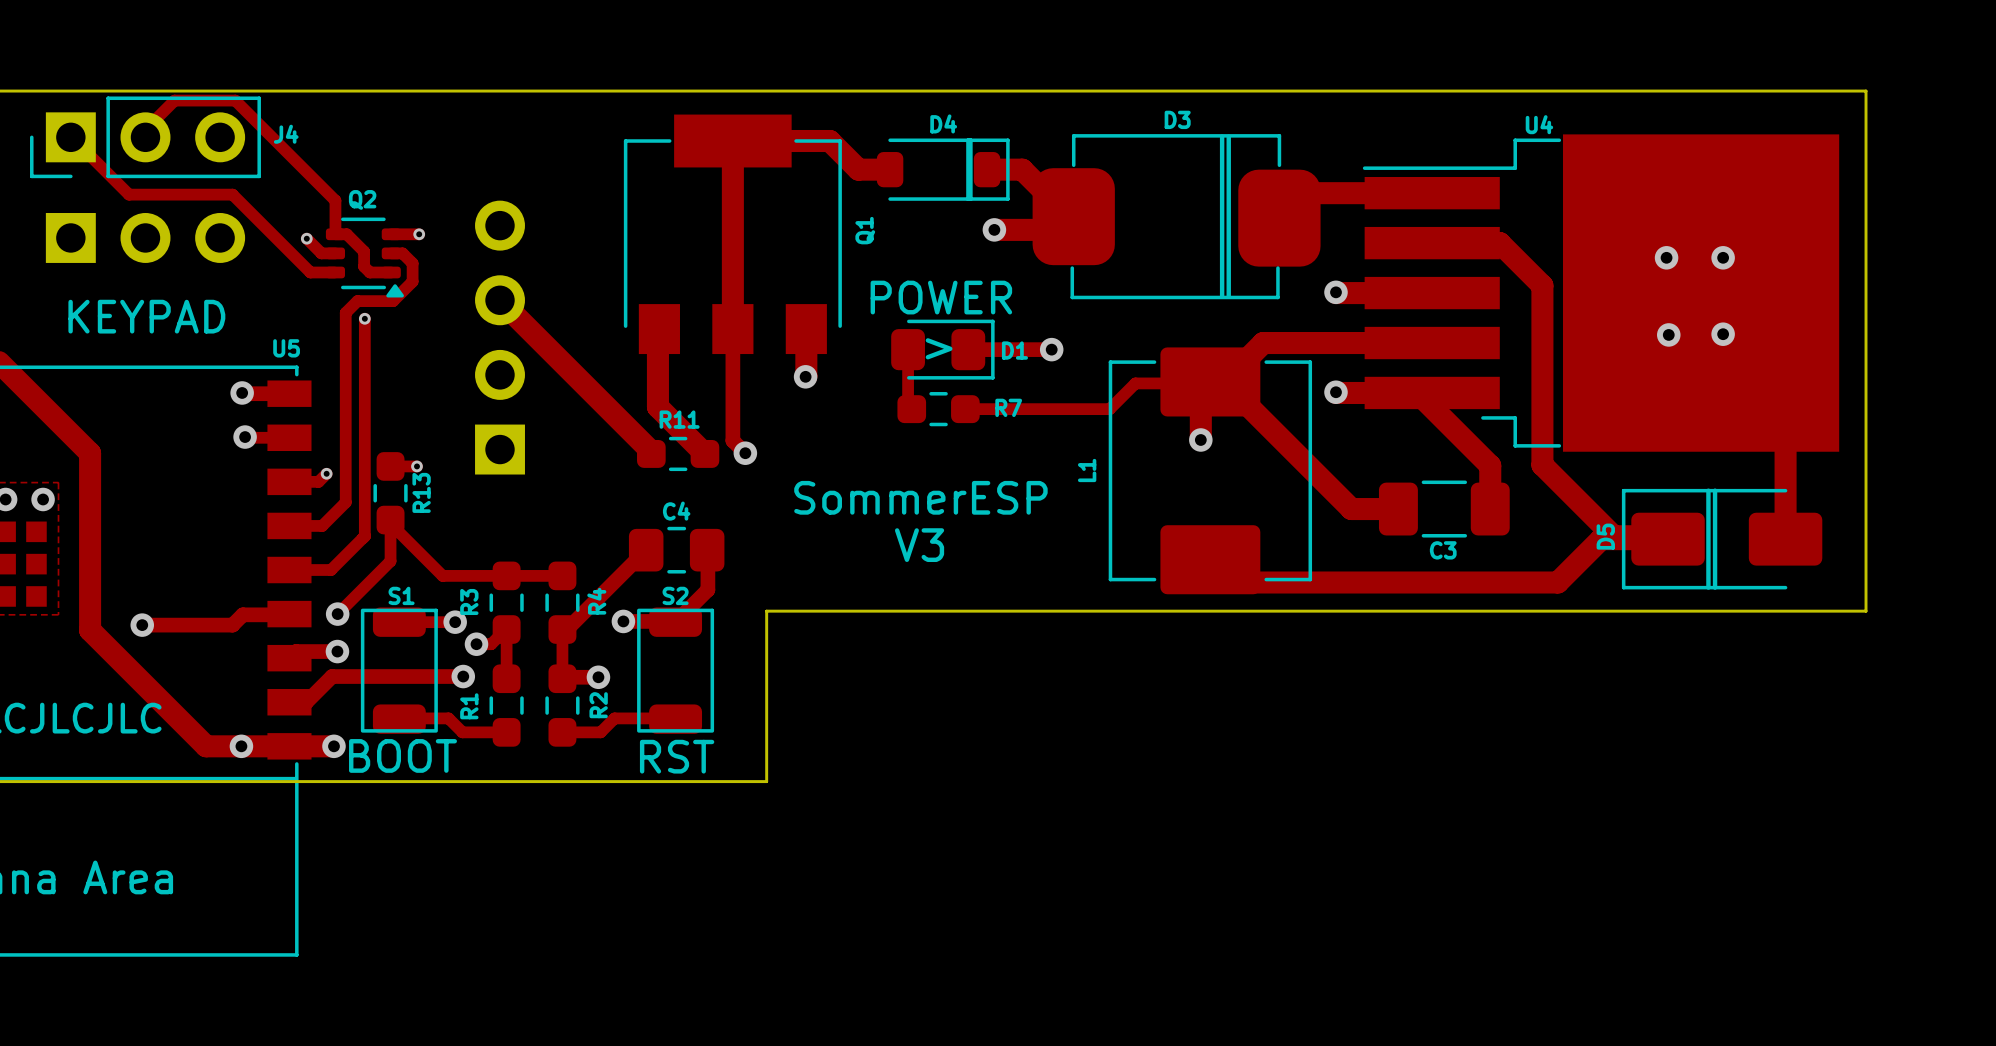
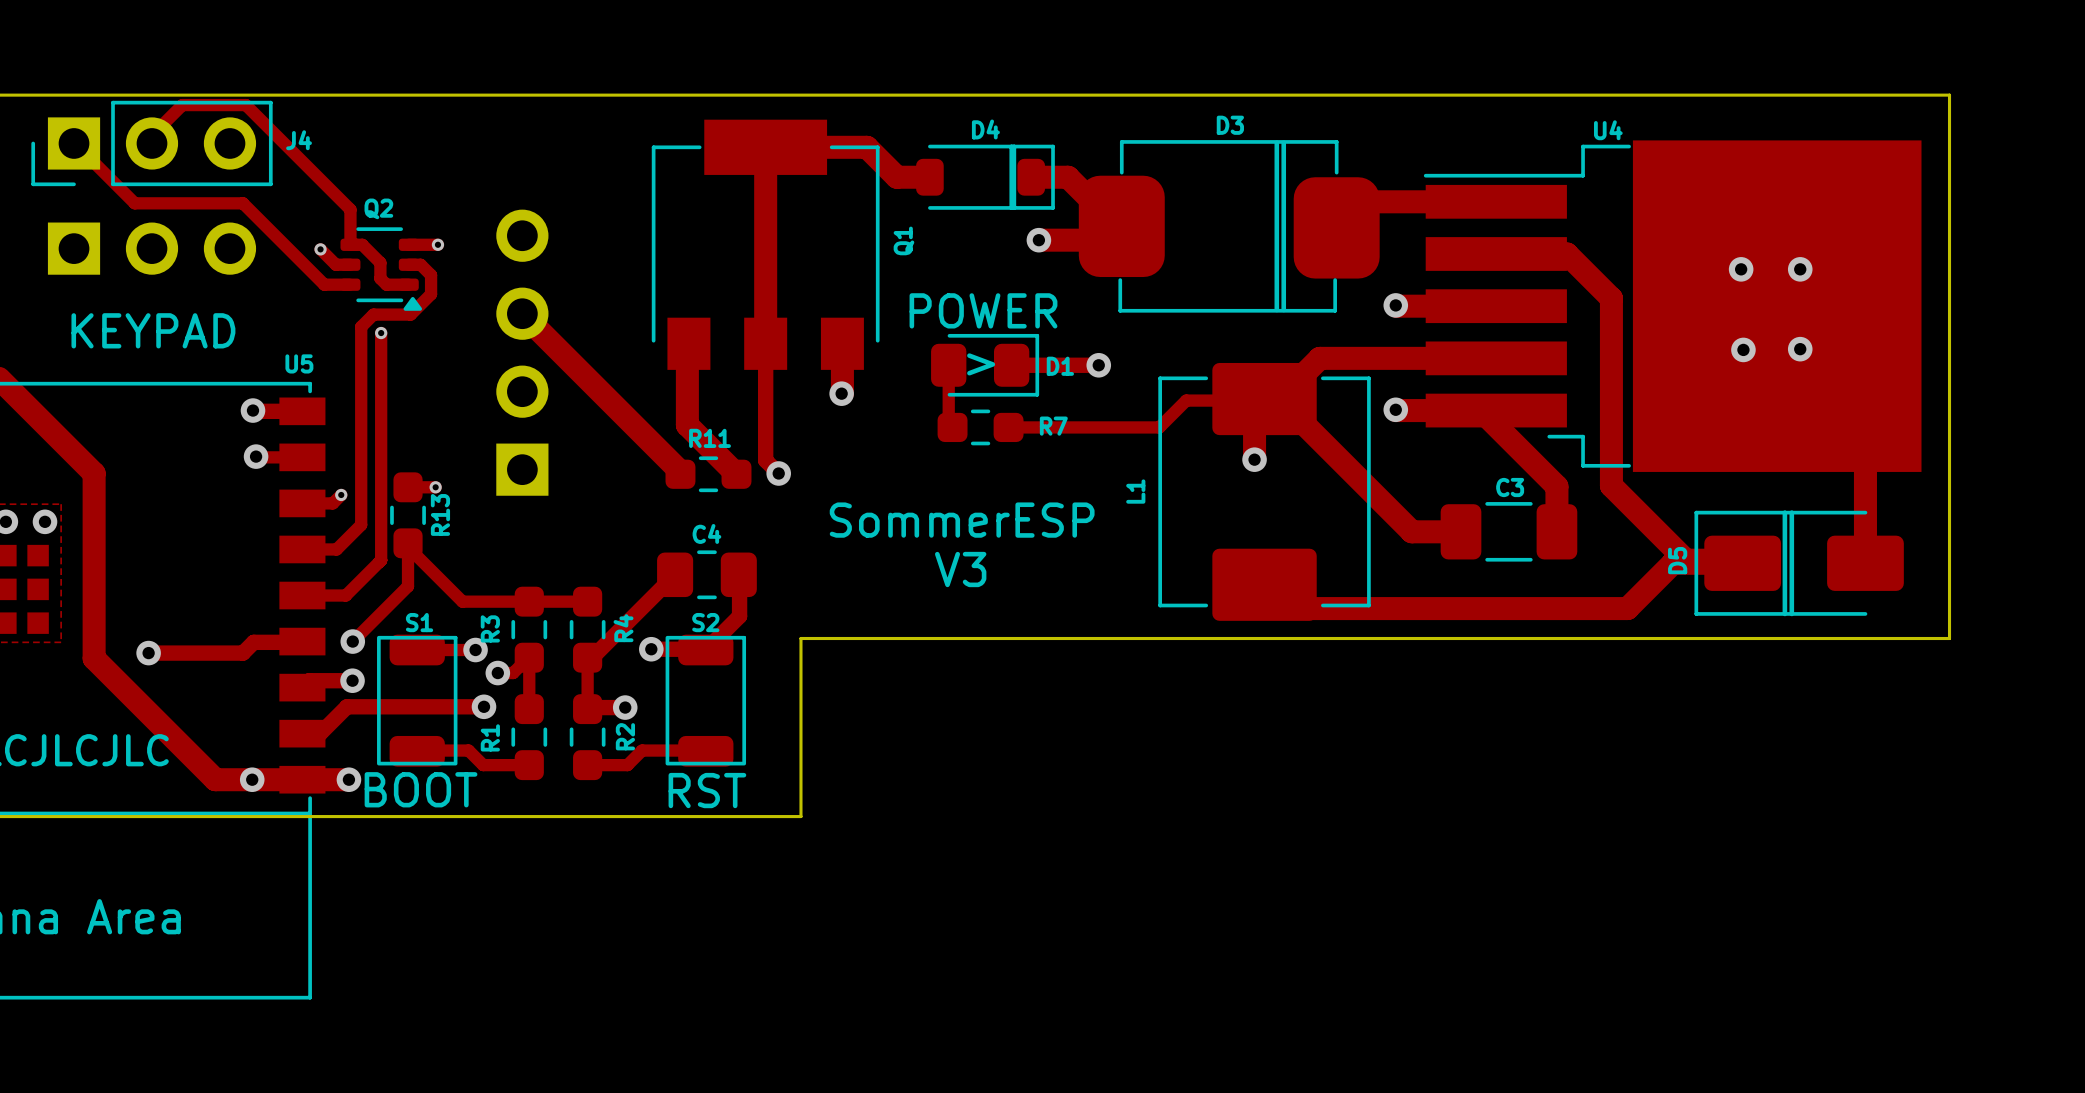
C3 name position: C3 (1443, 550) -> C3 (1510, 487)

